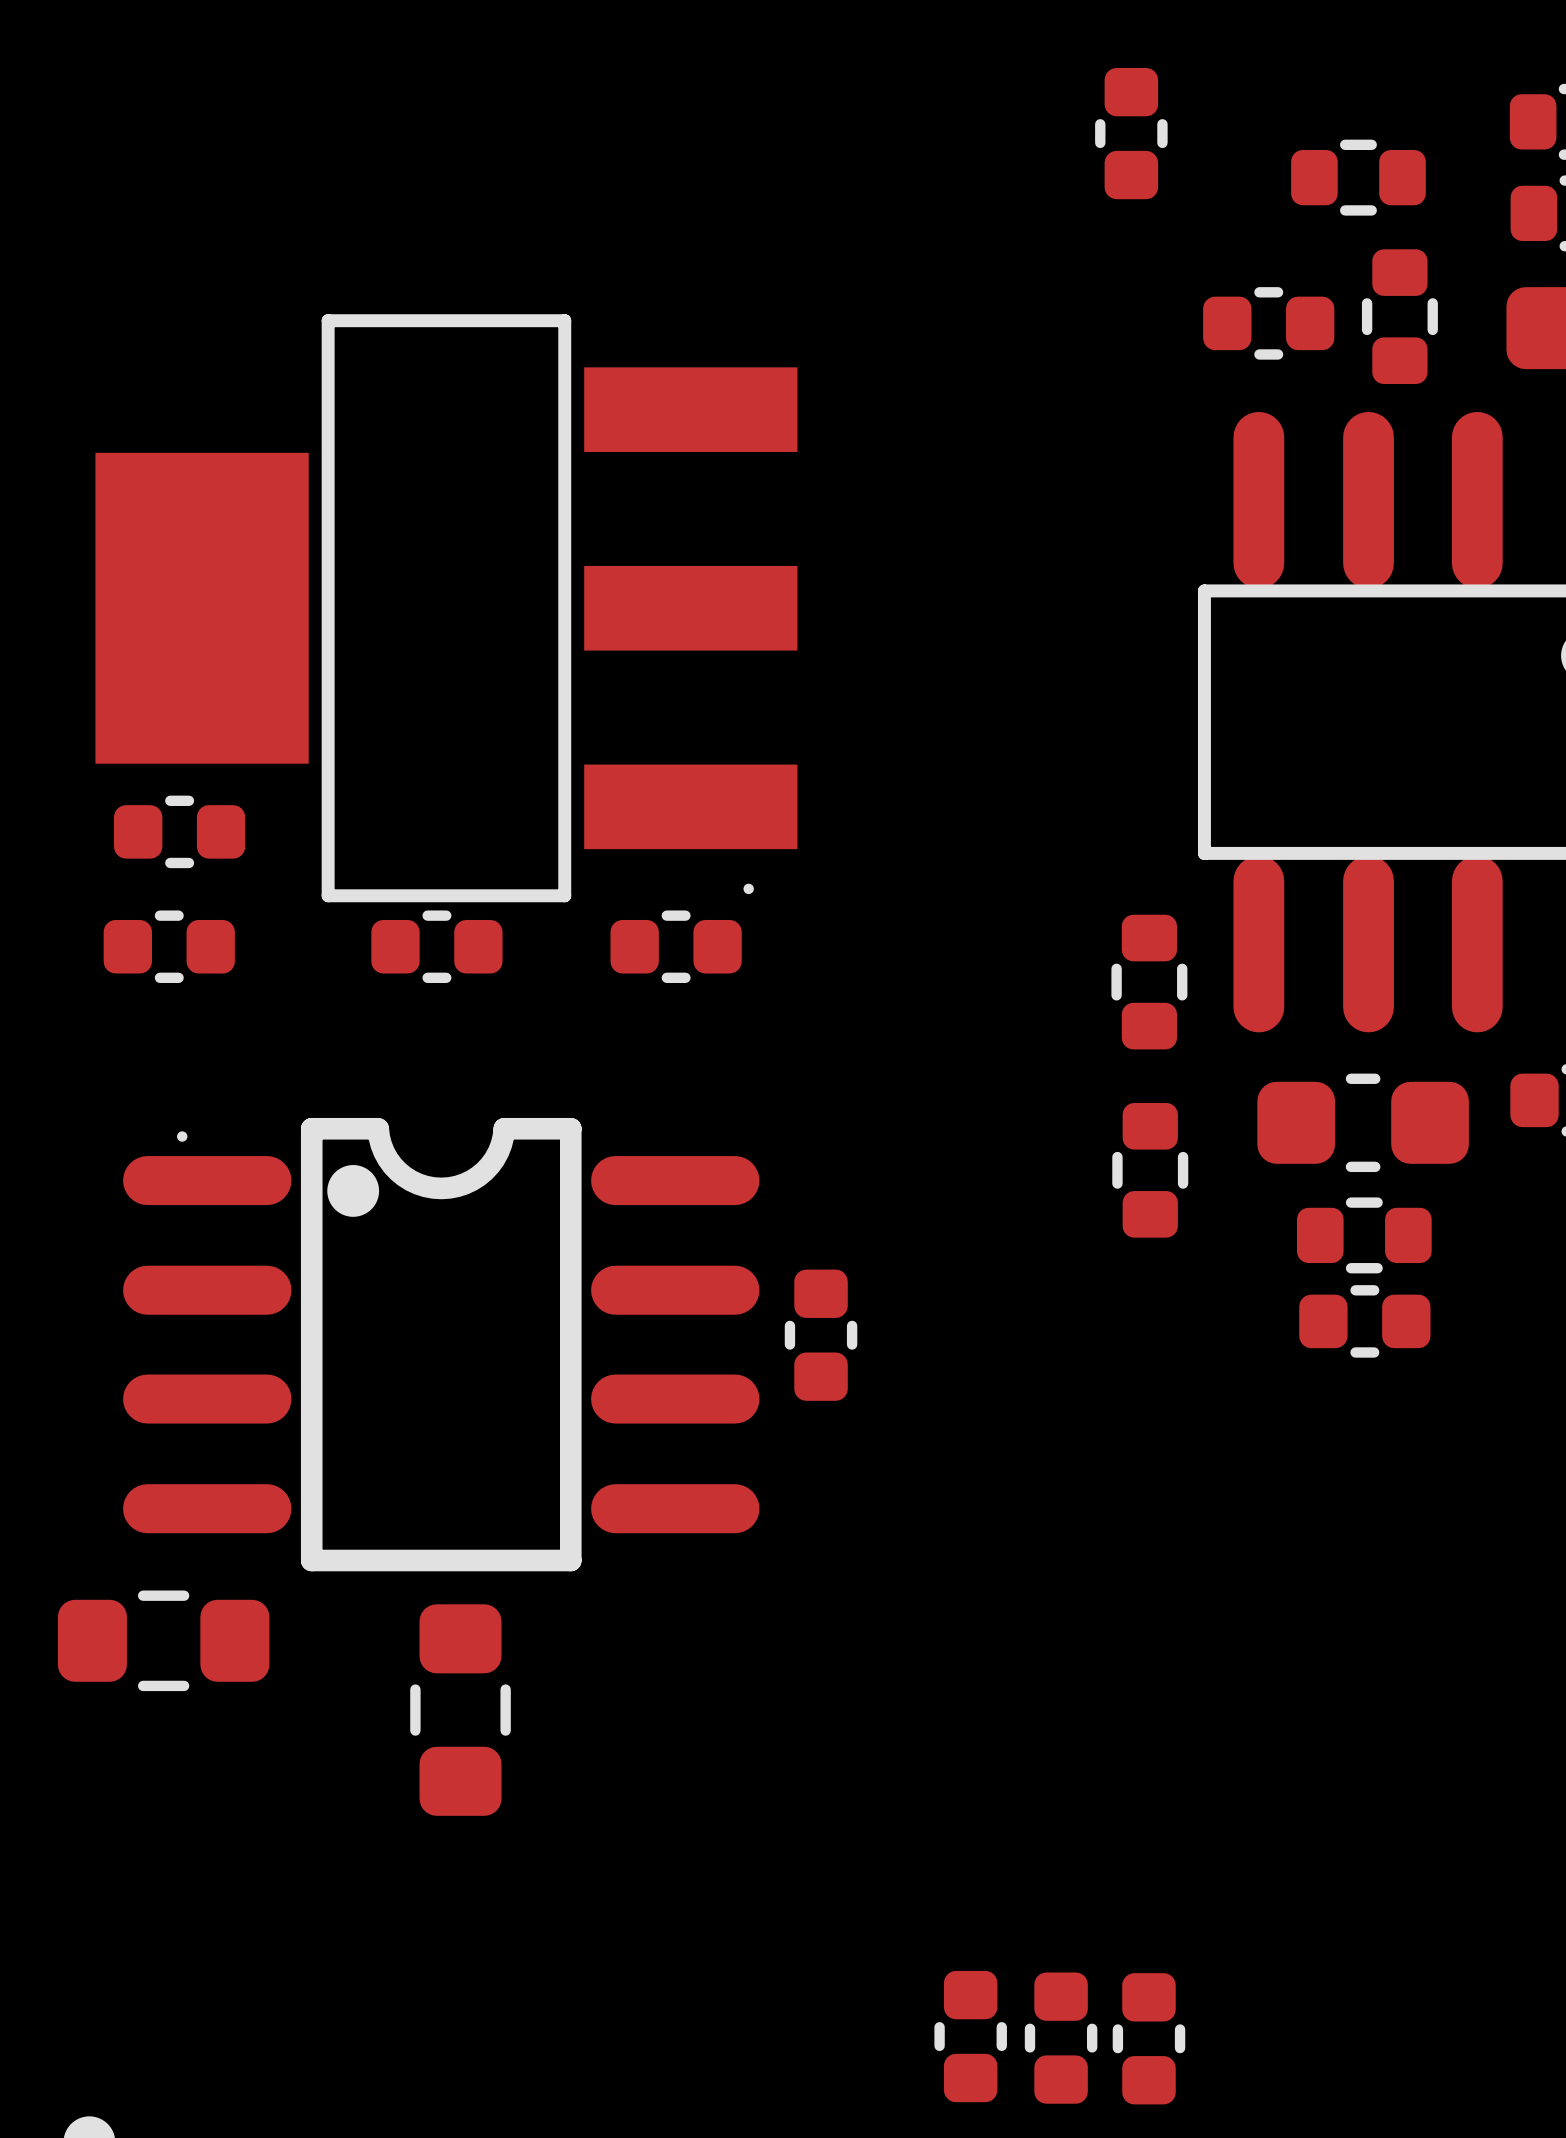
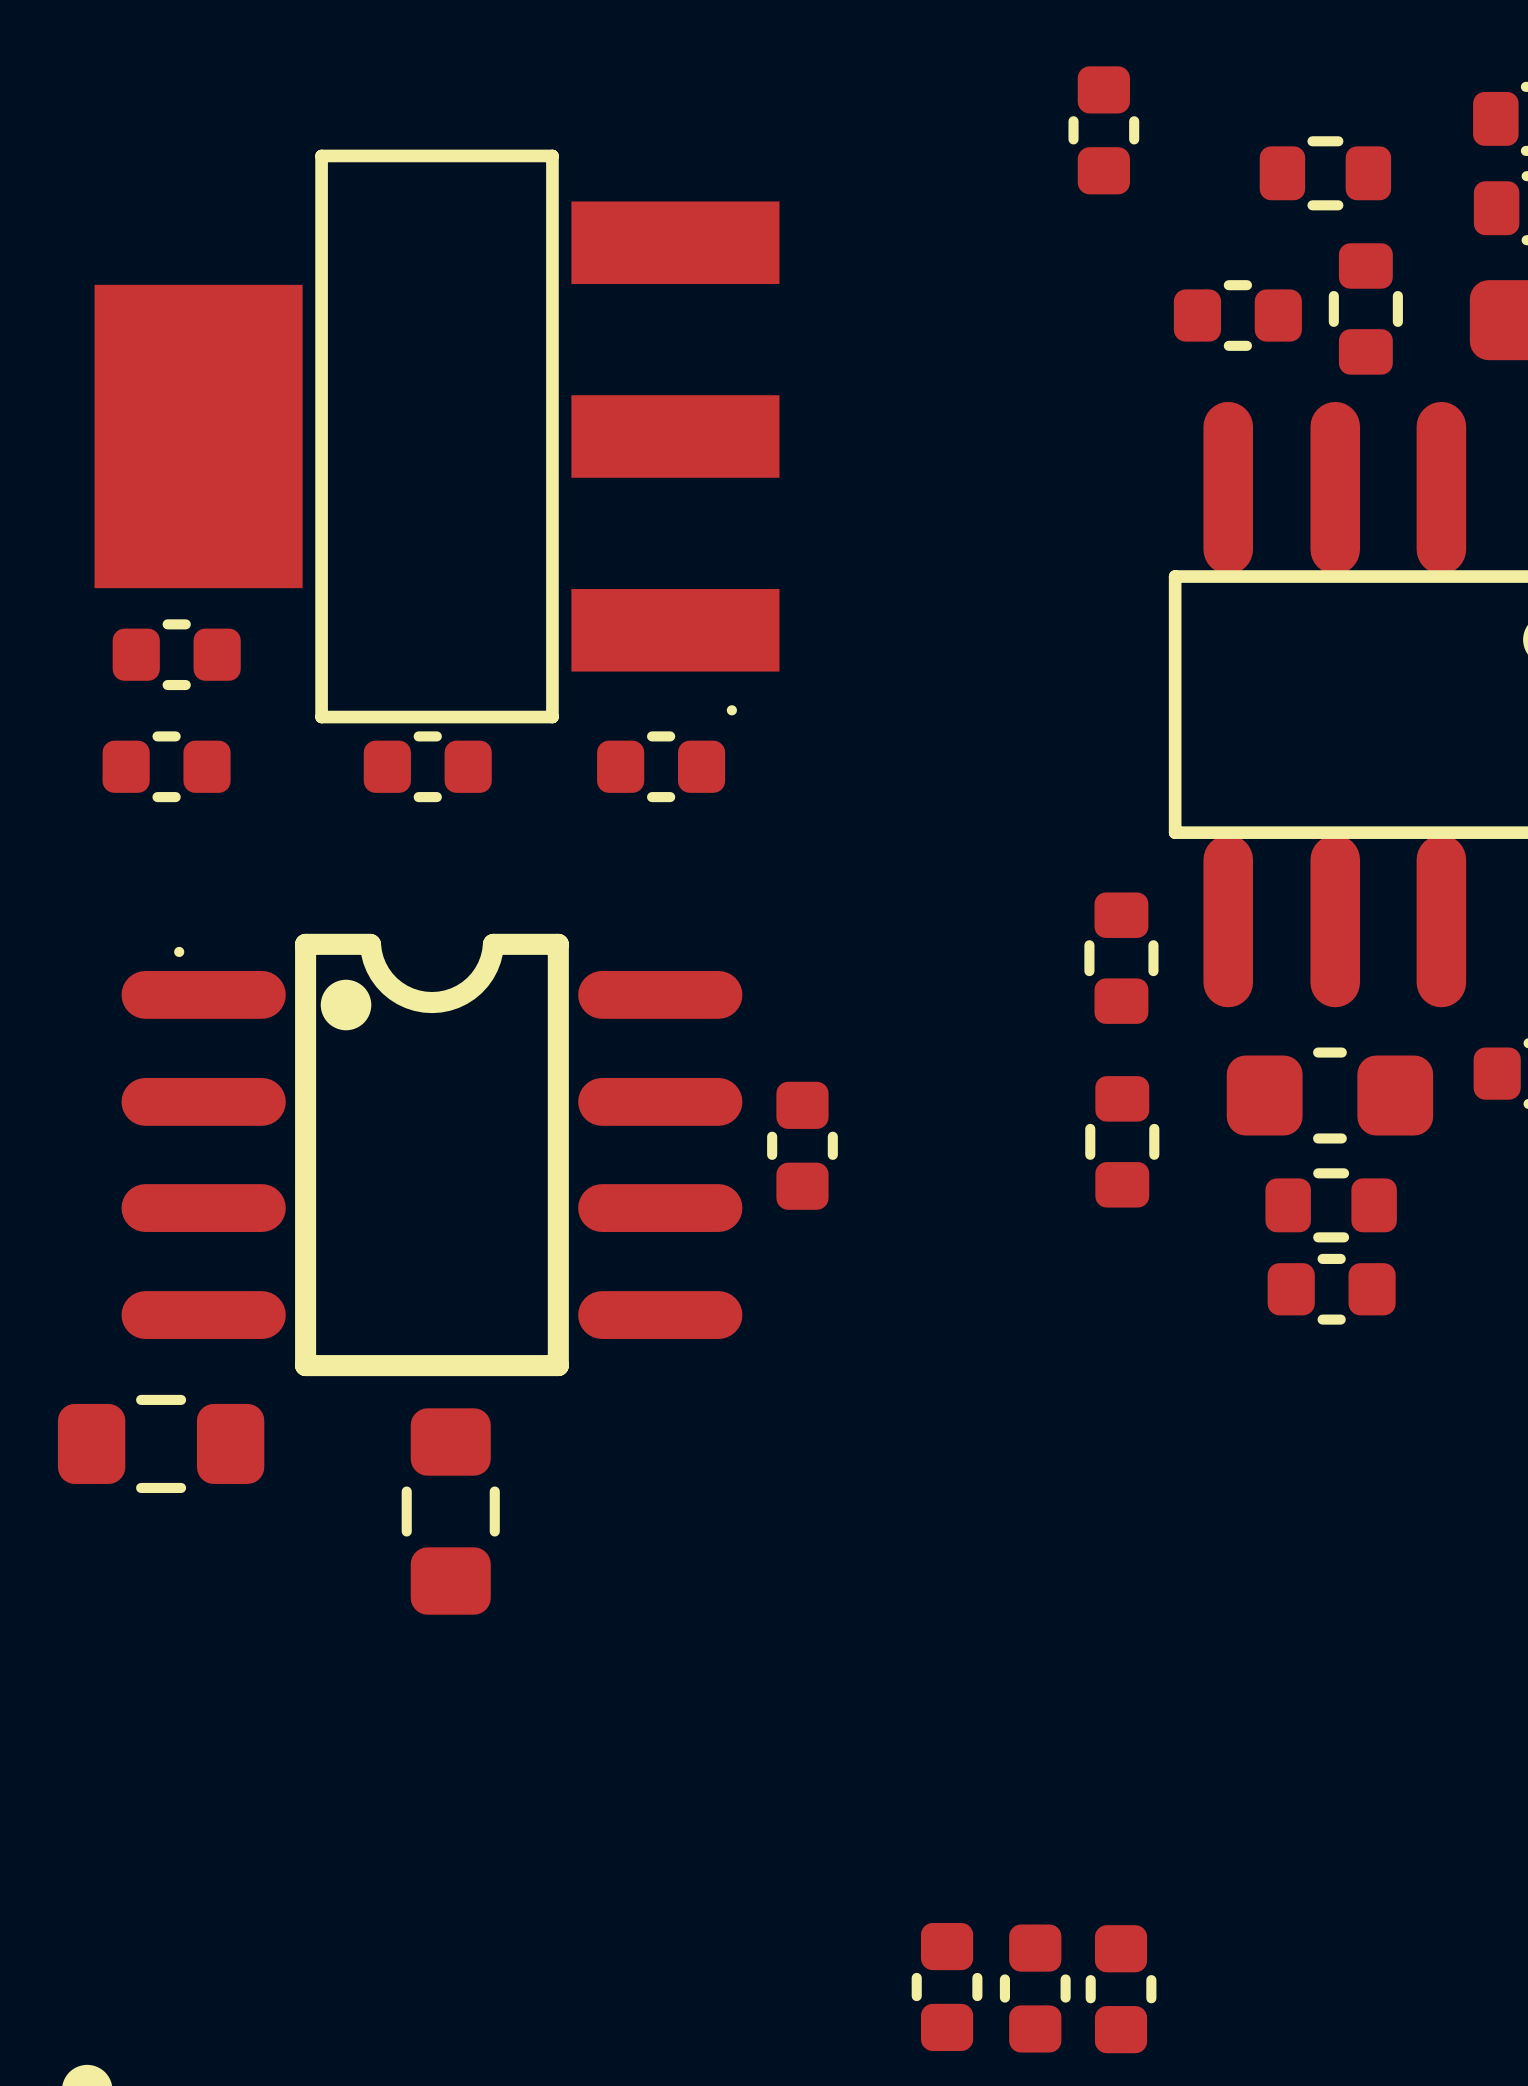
part position: (446, 608) -> (437, 436)
part: none -> (176, 654)
part: none -> (427, 766)
part: none -> (661, 766)
part position: (179, 831) -> (166, 766)
part: (169, 946) -> none
part: (436, 946) -> none
part: (676, 946) -> none
part: none -> (802, 1145)
part: (821, 1335) -> none
part position: (441, 1344) -> (431, 1154)
part: none -> (161, 1443)
part: none -> (450, 1511)
part: (163, 1640) -> none
part: (460, 1710) -> none

